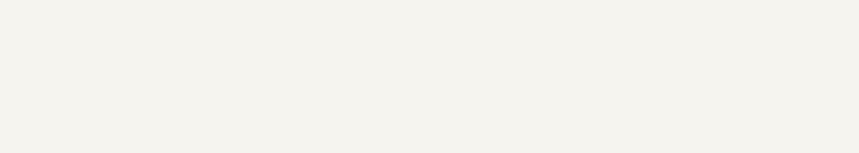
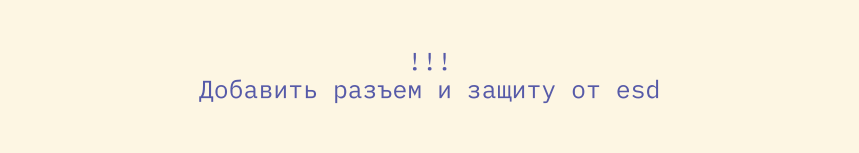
text: none -> !!! (429, 61)
text: none -> Добавить разъем и защиту от esd (428, 91)

